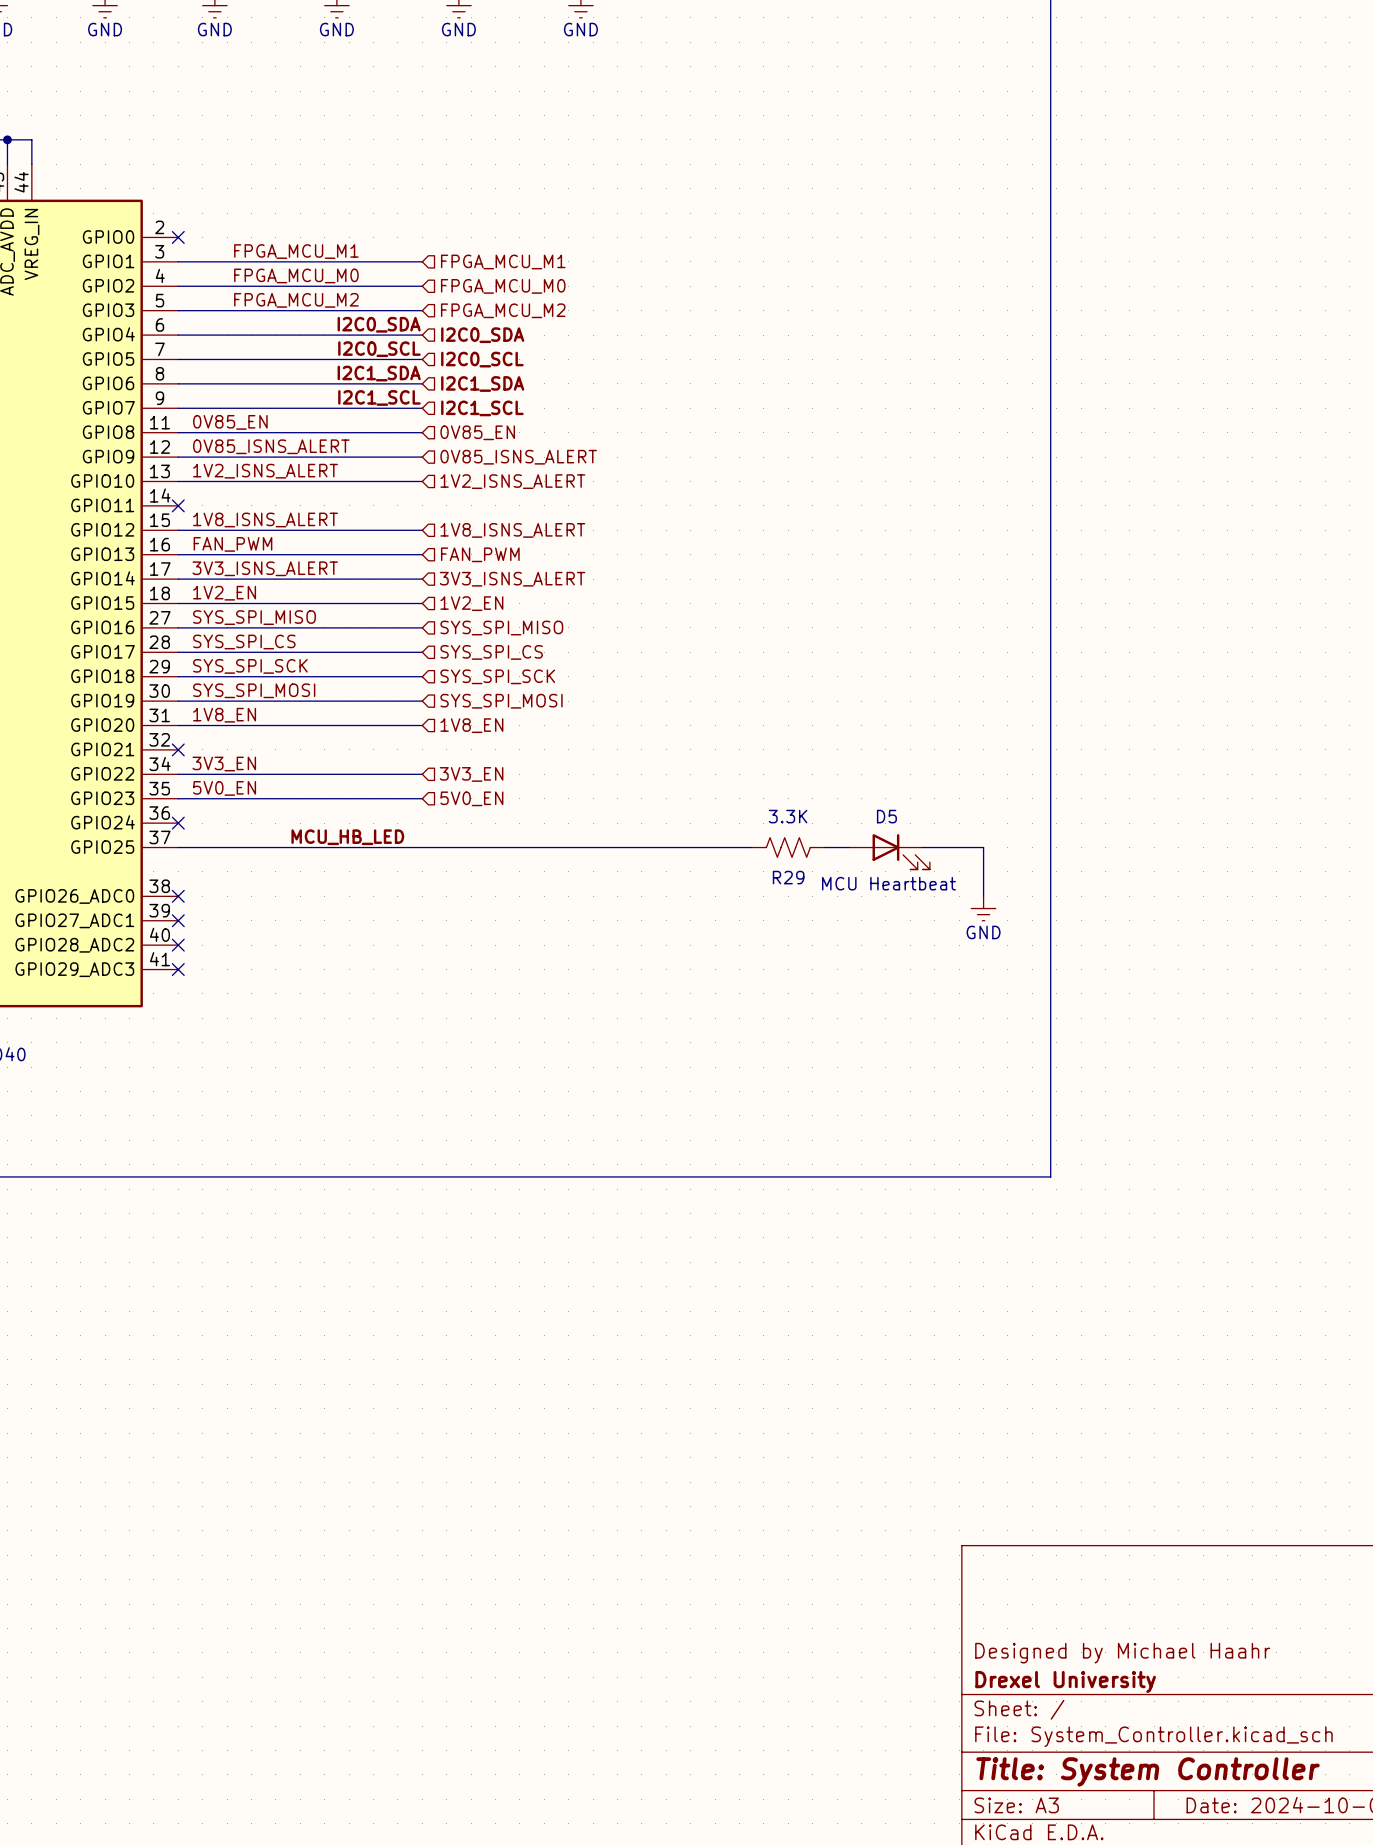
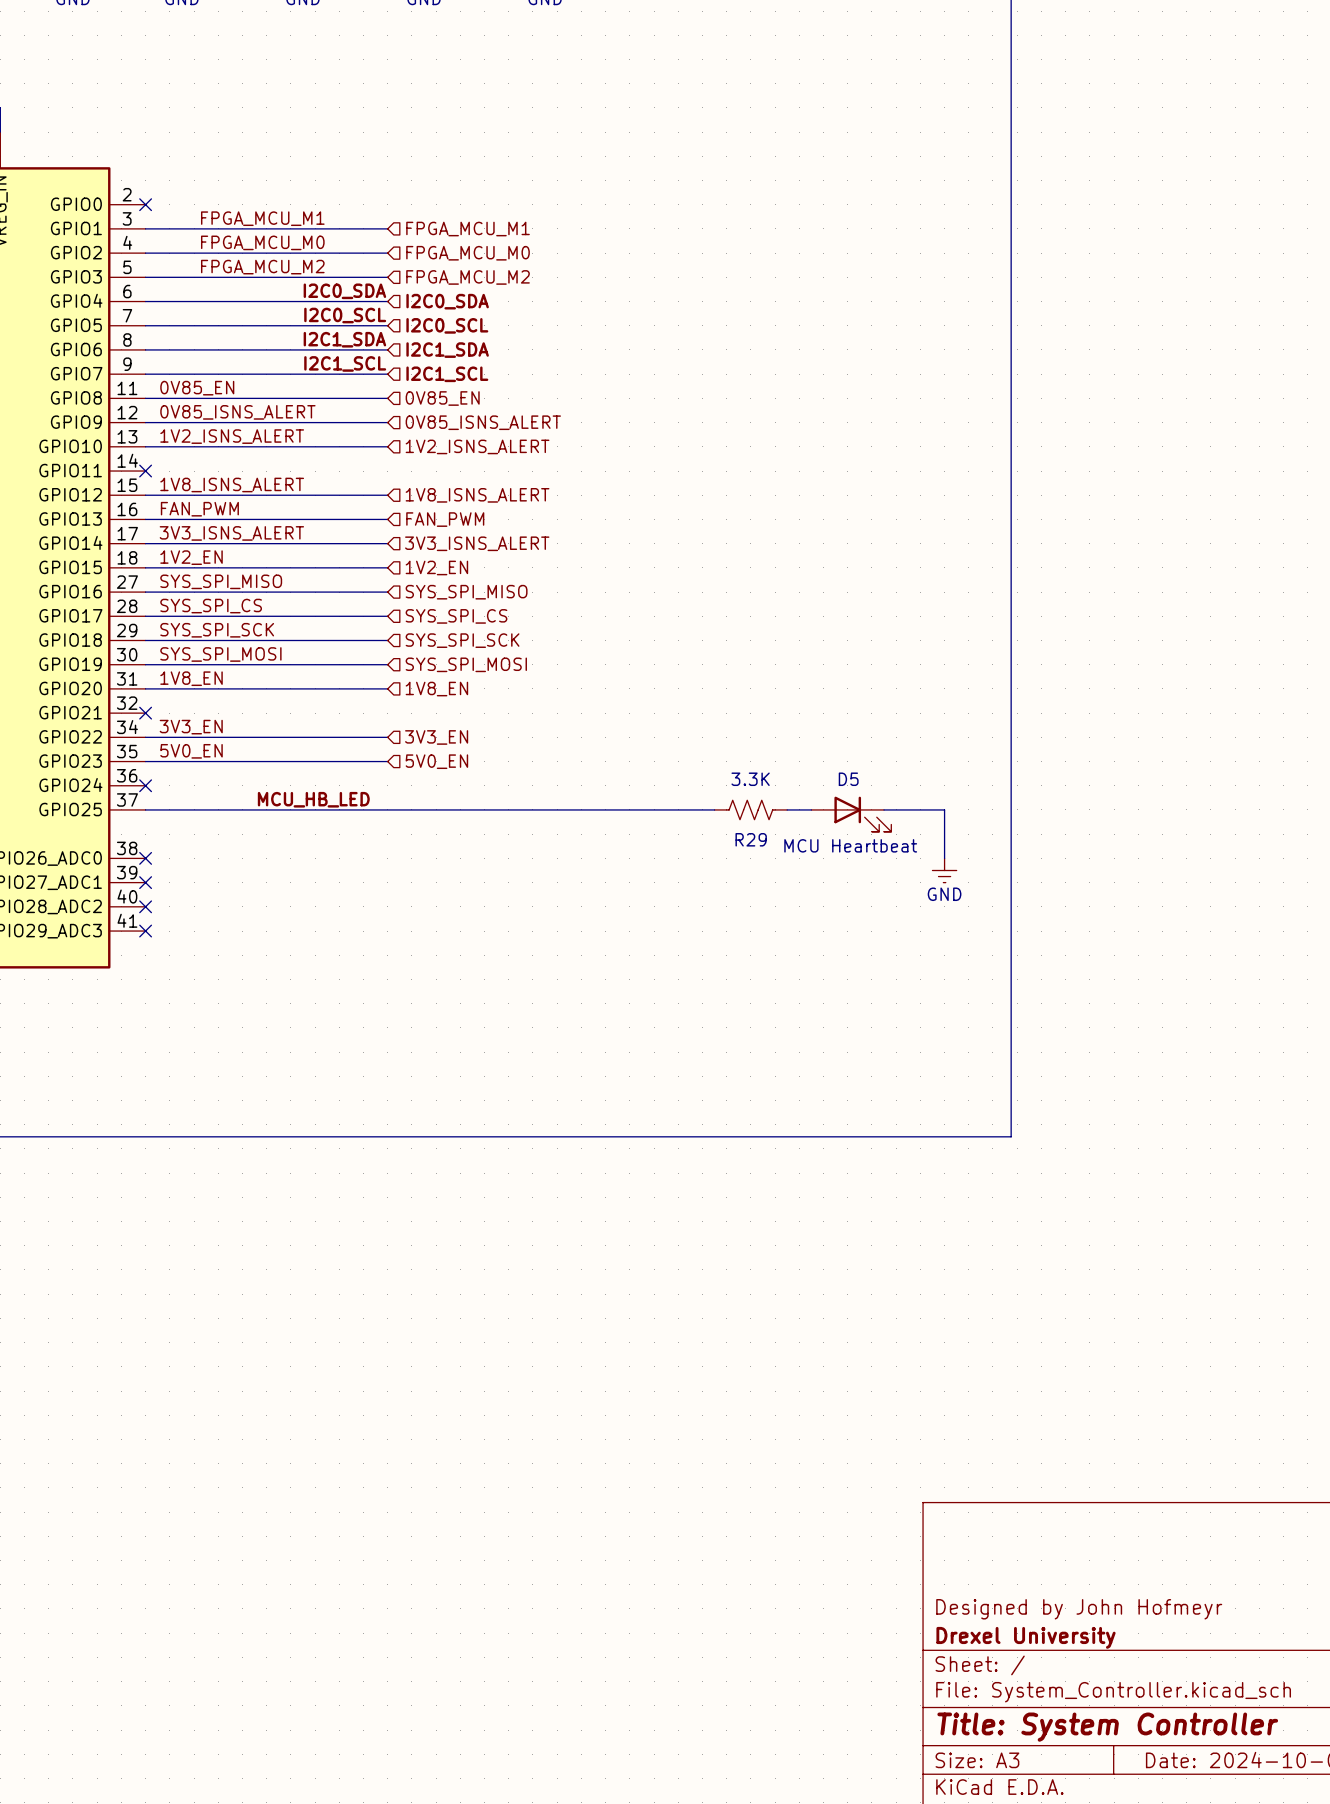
title block: Designed by Michael Haahr (1122, 1653) -> Designed by John Hofmeyr (1079, 1609)

